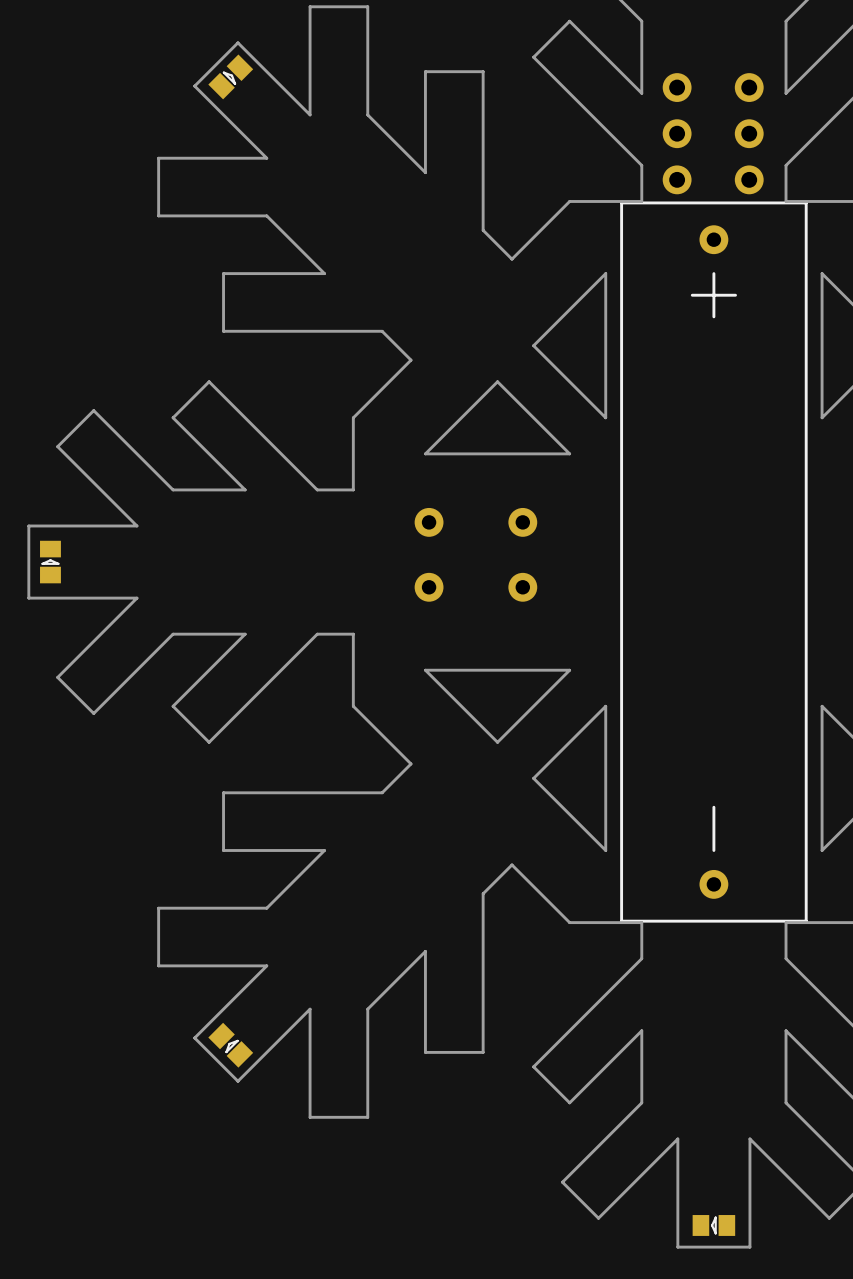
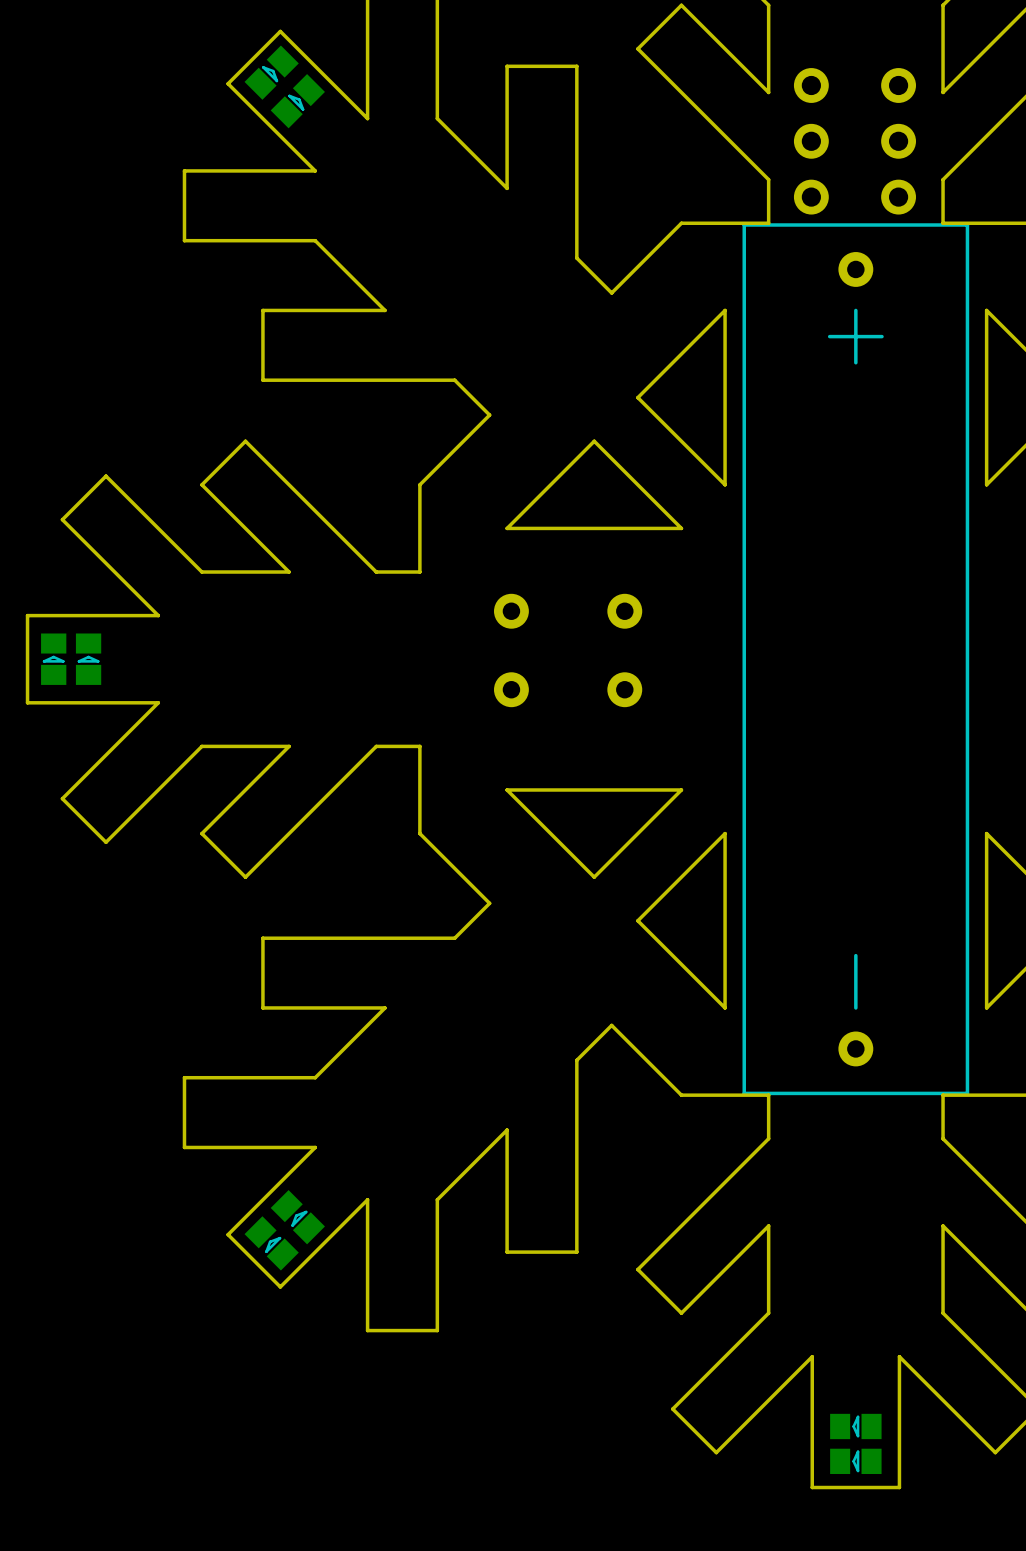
part: none -> (297, 101)
part: none -> (88, 659)
part: none -> (297, 1217)
part: none -> (855, 1426)

